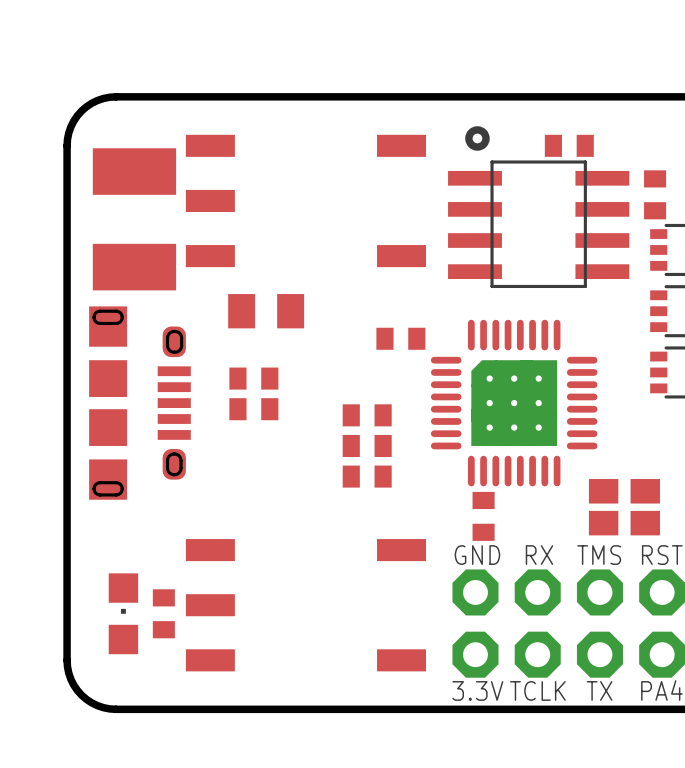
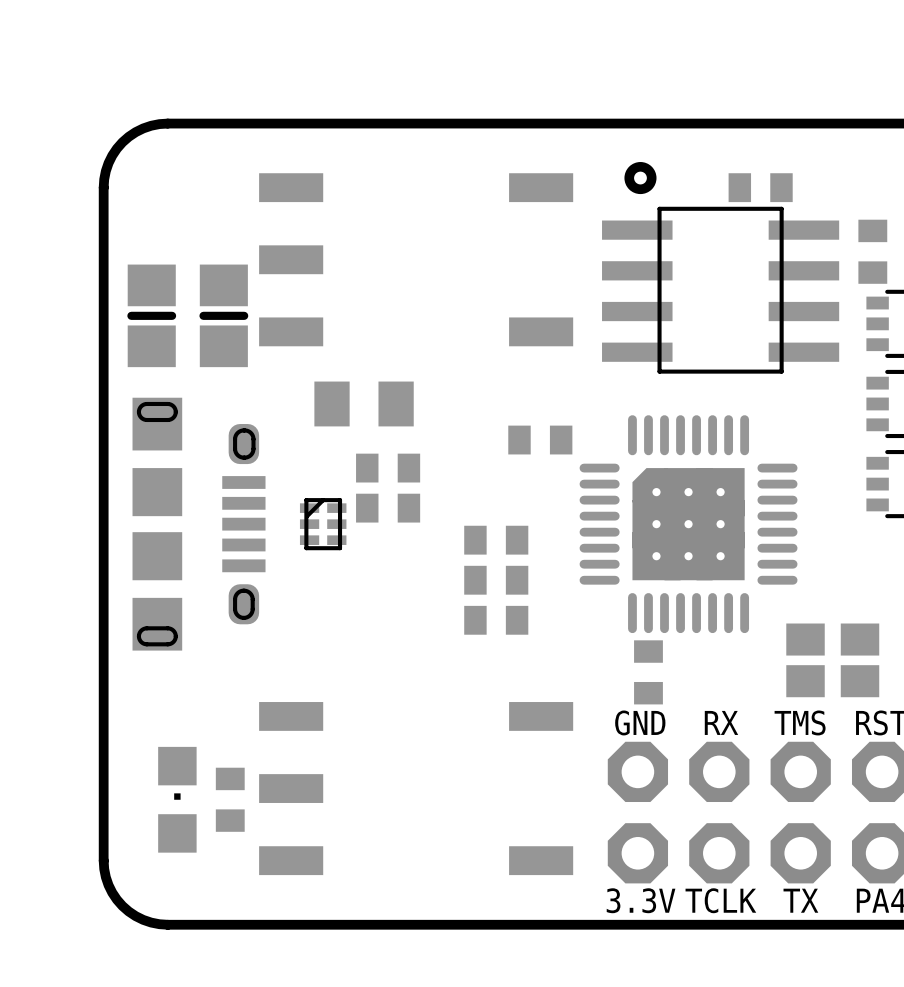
part: (134, 219) -> none
part: none -> (151, 315)
part: none -> (223, 315)
part: none -> (388, 468)
part: (253, 378) -> none
part: none -> (388, 508)
part: none -> (323, 524)
part: (253, 409) -> none

